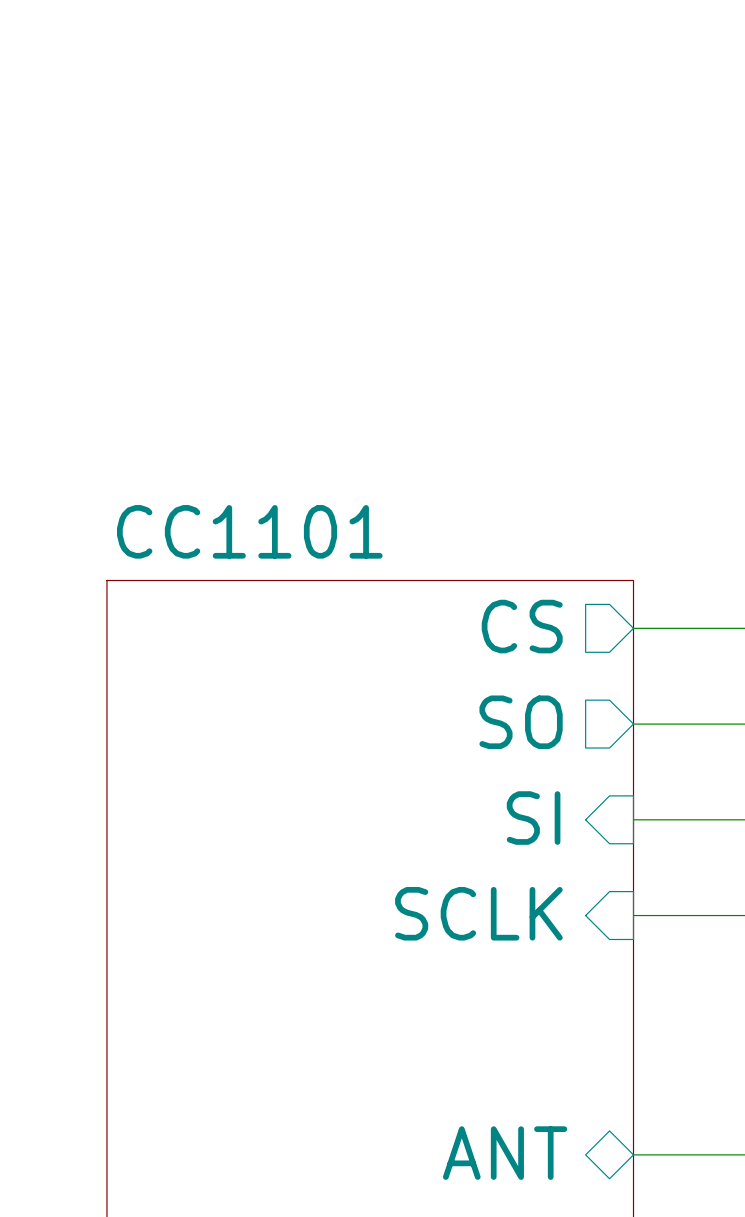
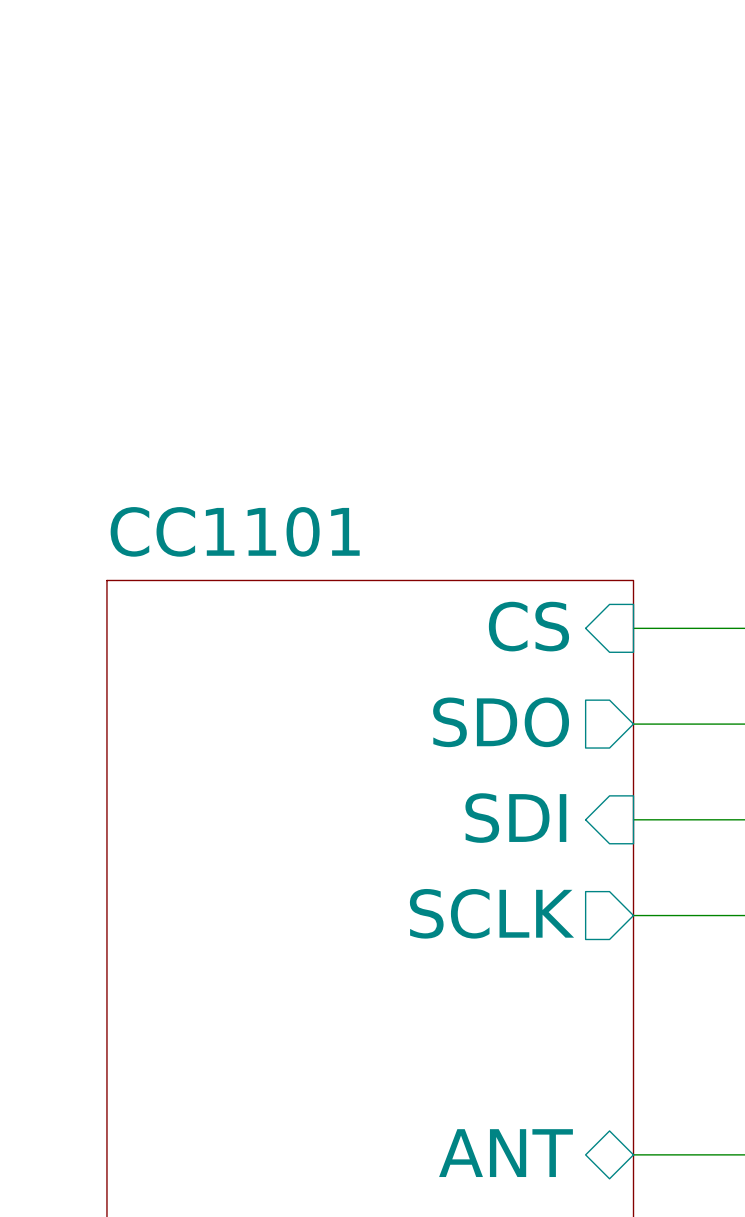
sheet pin shape: output (522, 626) -> input (528, 626)
sheet pin: SO (521, 722) -> SDO (501, 722)
sheet pin: SI (533, 818) -> SDI (515, 818)
sheet pin shape: input (478, 913) -> output (491, 913)

